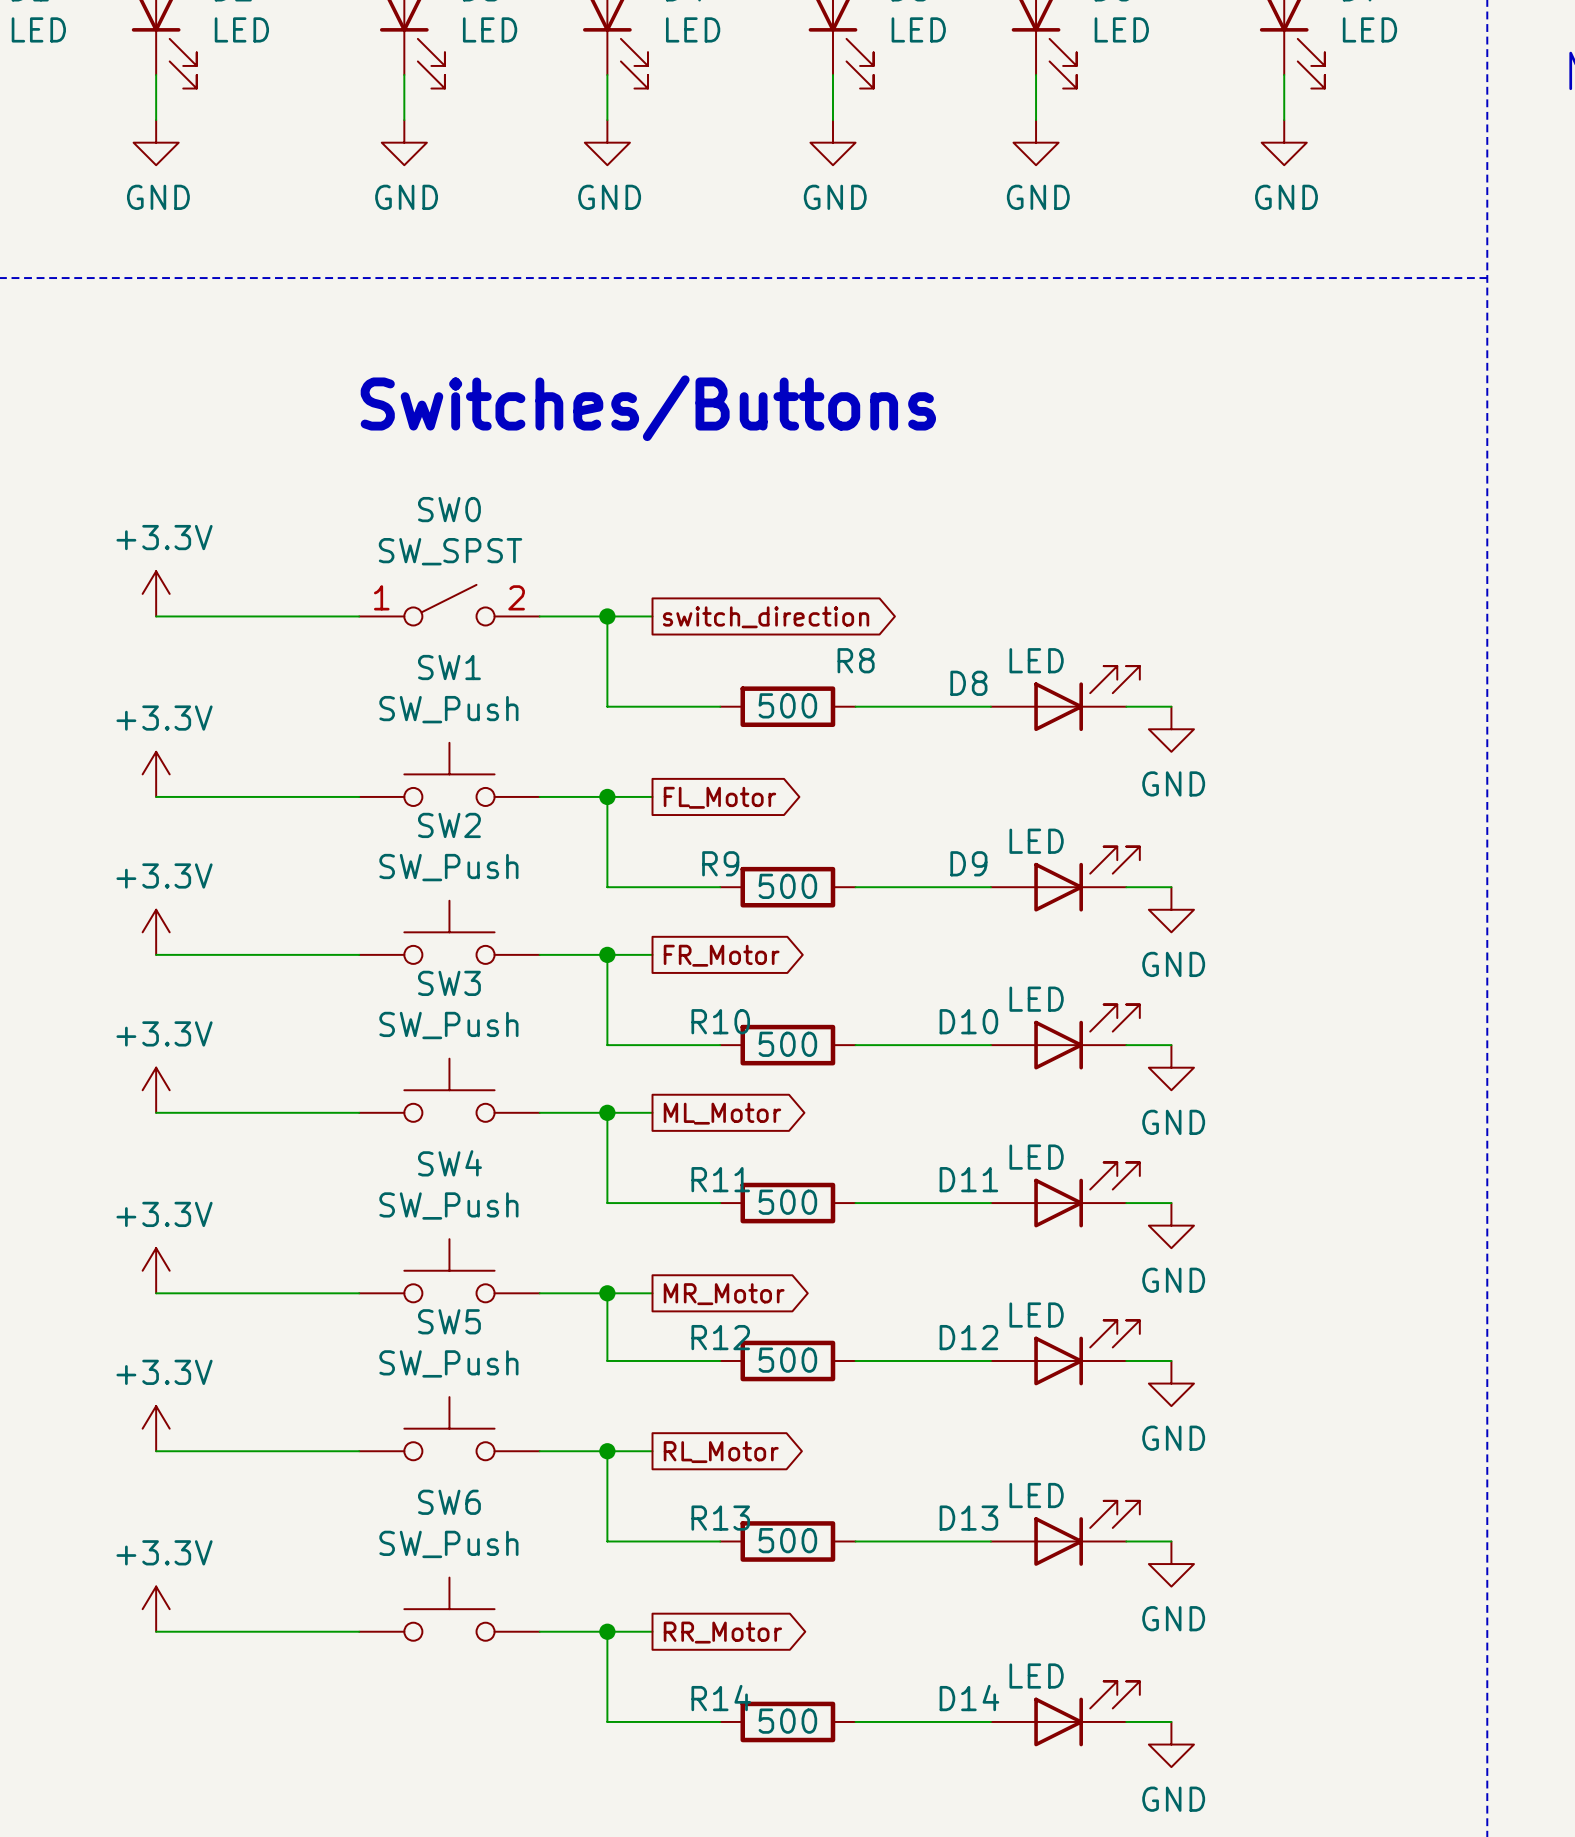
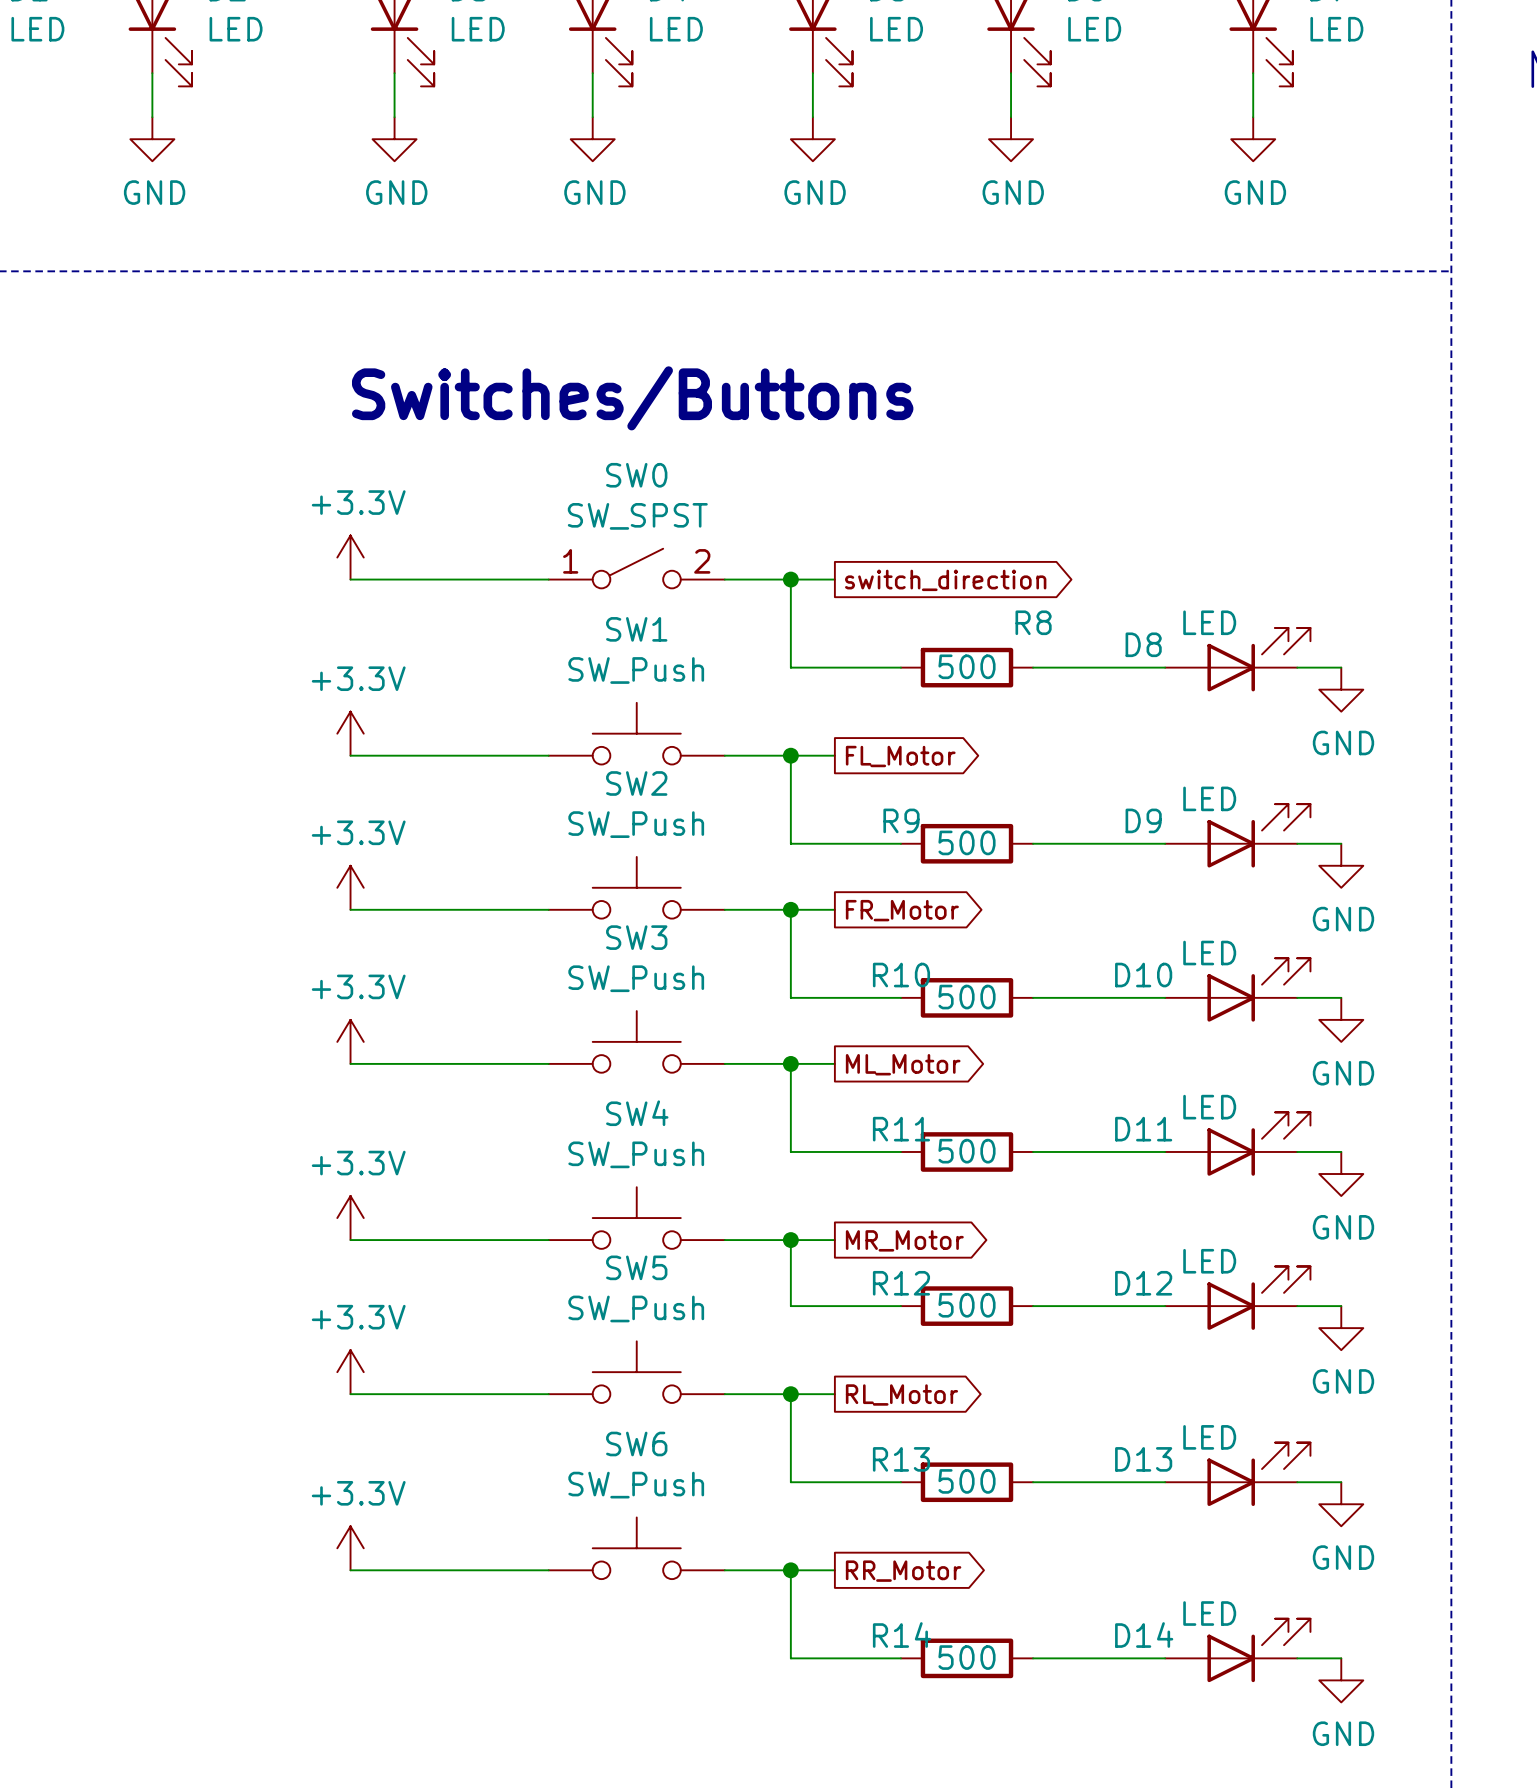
power symbol: none -> +3.3V (350, 557)
power symbol: +3.3V (156, 593) -> none
junction: none -> (790, 579)
SW0 position: (449, 605) -> (636, 568)
wire: (156, 616) (359, 616) -> (350, 579) (548, 579)
wire: (539, 616) (652, 616) -> (724, 579) (834, 579)
wire: (607, 616) (607, 706) (720, 706) -> (790, 579) (790, 667) (900, 667)
junction: (607, 616) -> none
global label position: switch_direction (766, 617) -> switch_direction (945, 580)
D8 position: (1065, 698) -> (1237, 659)
R8 position: (787, 706) -> (966, 667)
wire: (855, 706) (990, 706) -> (1033, 667) (1165, 667)
wire: (1126, 706) (1171, 706) -> (1297, 667) (1341, 667)
power symbol: none -> GND (1341, 689)
power symbol: GND (1171, 729) -> none
power symbol: none -> +3.3V (350, 733)
power symbol: +3.3V (156, 774) -> none
SW1 position: (449, 774) -> (636, 733)
junction: none -> (790, 755)
wire: (156, 796) (359, 796) -> (350, 755) (548, 755)
wire: (539, 796) (652, 796) -> (724, 755) (834, 755)
wire: (607, 796) (607, 887) (720, 887) -> (790, 755) (790, 843) (900, 843)
junction: (607, 796) -> none
global label position: FL_Motor (719, 797) -> FL_Motor (900, 756)
D9 position: (1065, 879) -> (1237, 835)
R9 position: (787, 887) -> (966, 843)
wire: (855, 887) (990, 887) -> (1033, 843) (1165, 843)
wire: (1126, 887) (1171, 887) -> (1297, 843) (1341, 843)
power symbol: none -> GND (1341, 865)
power symbol: none -> +3.3V (350, 887)
power symbol: GND (1171, 909) -> none
power symbol: +3.3V (156, 932) -> none
SW2 position: (449, 932) -> (636, 887)
junction: none -> (790, 909)
wire: (156, 954) (359, 954) -> (350, 909) (548, 909)
wire: (539, 954) (652, 954) -> (724, 909) (834, 909)
wire: (607, 954) (607, 1045) (720, 1045) -> (790, 909) (790, 997) (900, 997)
junction: (607, 954) -> none
global label position: FR_Motor (721, 955) -> FR_Motor (902, 910)
D10 position: (1065, 1037) -> (1237, 989)
R10 position: (787, 1045) -> (966, 997)
wire: (855, 1045) (990, 1045) -> (1033, 997) (1165, 997)
wire: (1126, 1045) (1171, 1045) -> (1297, 997) (1341, 997)
power symbol: none -> GND (1341, 1019)
power symbol: none -> +3.3V (350, 1041)
power symbol: GND (1171, 1067) -> none
power symbol: +3.3V (156, 1090) -> none
SW3 position: (449, 1090) -> (636, 1041)
junction: none -> (790, 1063)
wire: (156, 1112) (359, 1112) -> (350, 1063) (548, 1063)
wire: (539, 1112) (652, 1112) -> (724, 1063) (834, 1063)
wire: (607, 1112) (607, 1203) (720, 1203) -> (790, 1063) (790, 1151) (900, 1151)
junction: (607, 1112) -> none
global label position: ML_Motor (722, 1113) -> ML_Motor (903, 1064)
D11 position: (1065, 1194) -> (1237, 1144)
R11 position: (787, 1203) -> (966, 1151)
wire: (855, 1203) (990, 1203) -> (1033, 1151) (1165, 1151)
wire: (1126, 1203) (1171, 1203) -> (1297, 1151) (1341, 1151)
power symbol: none -> GND (1341, 1174)
power symbol: GND (1171, 1225) -> none
power symbol: none -> +3.3V (350, 1218)
power symbol: +3.3V (156, 1270) -> none
SW4 position: (449, 1270) -> (636, 1218)
junction: none -> (790, 1240)
wire: (156, 1293) (359, 1293) -> (350, 1240) (548, 1240)
wire: (539, 1293) (652, 1293) -> (724, 1240) (834, 1240)
wire: (607, 1293) (607, 1360) (720, 1360) -> (790, 1240) (790, 1306) (900, 1306)
junction: (607, 1293) -> none
global label position: MR_Motor (724, 1294) -> MR_Motor (904, 1240)
D12 position: (1065, 1352) -> (1237, 1298)
R12 position: (787, 1360) -> (966, 1306)
wire: (855, 1360) (990, 1360) -> (1033, 1306) (1165, 1306)
wire: (1126, 1360) (1171, 1360) -> (1297, 1306) (1341, 1306)
power symbol: none -> GND (1341, 1328)
power symbol: GND (1171, 1383) -> none
power symbol: none -> +3.3V (350, 1372)
power symbol: +3.3V (156, 1428) -> none
SW5 position: (449, 1428) -> (636, 1372)
junction: none -> (790, 1394)
wire: (156, 1451) (359, 1451) -> (350, 1394) (548, 1394)
wire: (539, 1451) (652, 1451) -> (724, 1394) (834, 1394)
wire: (607, 1451) (607, 1541) (720, 1541) -> (790, 1394) (790, 1482) (900, 1482)
junction: (607, 1451) -> none
global label position: RL_Motor (721, 1452) -> RL_Motor (901, 1394)
D13 position: (1065, 1533) -> (1237, 1474)
R13 position: (787, 1541) -> (966, 1482)
wire: (855, 1541) (990, 1541) -> (1033, 1482) (1165, 1482)
wire: (1126, 1541) (1171, 1541) -> (1297, 1482) (1341, 1482)
power symbol: none -> GND (1341, 1504)
power symbol: GND (1171, 1564) -> none
power symbol: none -> +3.3V (350, 1548)
power symbol: +3.3V (156, 1609) -> none
SW6 position: (449, 1609) -> (636, 1548)
junction: none -> (790, 1570)
wire: (156, 1631) (359, 1631) -> (350, 1570) (548, 1570)
wire: (539, 1631) (652, 1631) -> (724, 1570) (834, 1570)
wire: (607, 1631) (607, 1721) (720, 1721) -> (790, 1570) (790, 1658) (900, 1658)
junction: (607, 1631) -> none
global label position: RR_Motor (722, 1632) -> RR_Motor (903, 1571)
D14 position: (1065, 1713) -> (1237, 1650)
R14 position: (787, 1721) -> (966, 1658)
wire: (855, 1721) (990, 1721) -> (1033, 1658) (1165, 1658)
wire: (1126, 1721) (1171, 1721) -> (1297, 1658) (1341, 1658)
power symbol: none -> GND (1341, 1680)
power symbol: GND (1171, 1744) -> none

